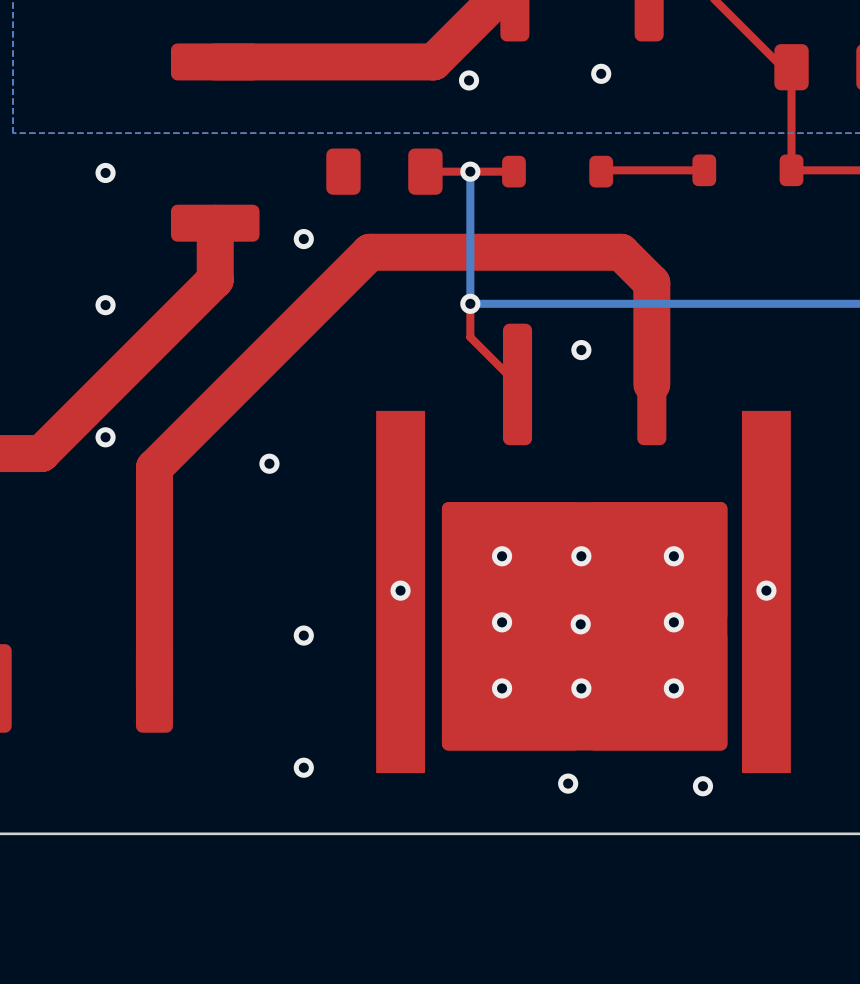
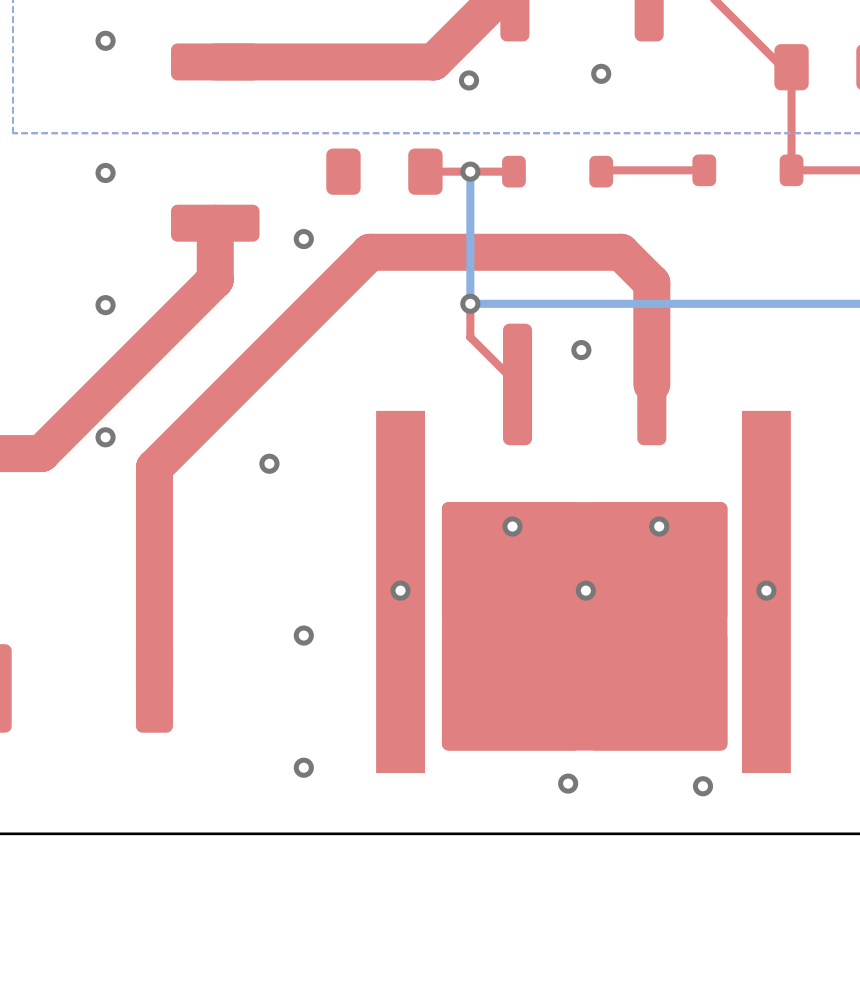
via: none -> (105, 40)
via position: (502, 556) -> (512, 526)
via: (581, 556) -> none
via position: (673, 556) -> (659, 526)
via: none -> (585, 590)
via: (502, 622) -> none
via: (673, 622) -> none
via: (580, 624) -> none
via: (502, 688) -> none
via: (581, 688) -> none
via: (673, 688) -> none

